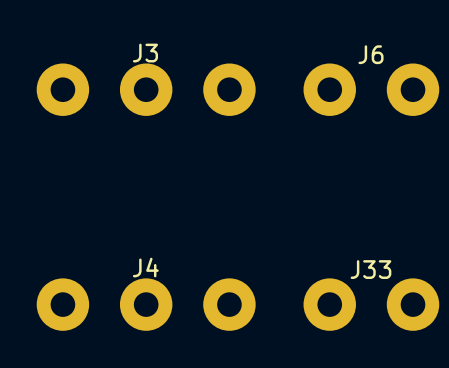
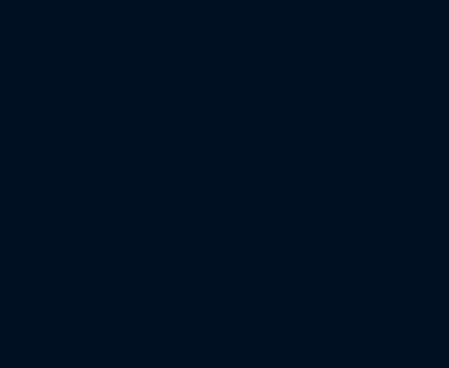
J3: (146, 89) -> none
J6: (371, 89) -> none
J4: (146, 304) -> none
J33: (371, 304) -> none

